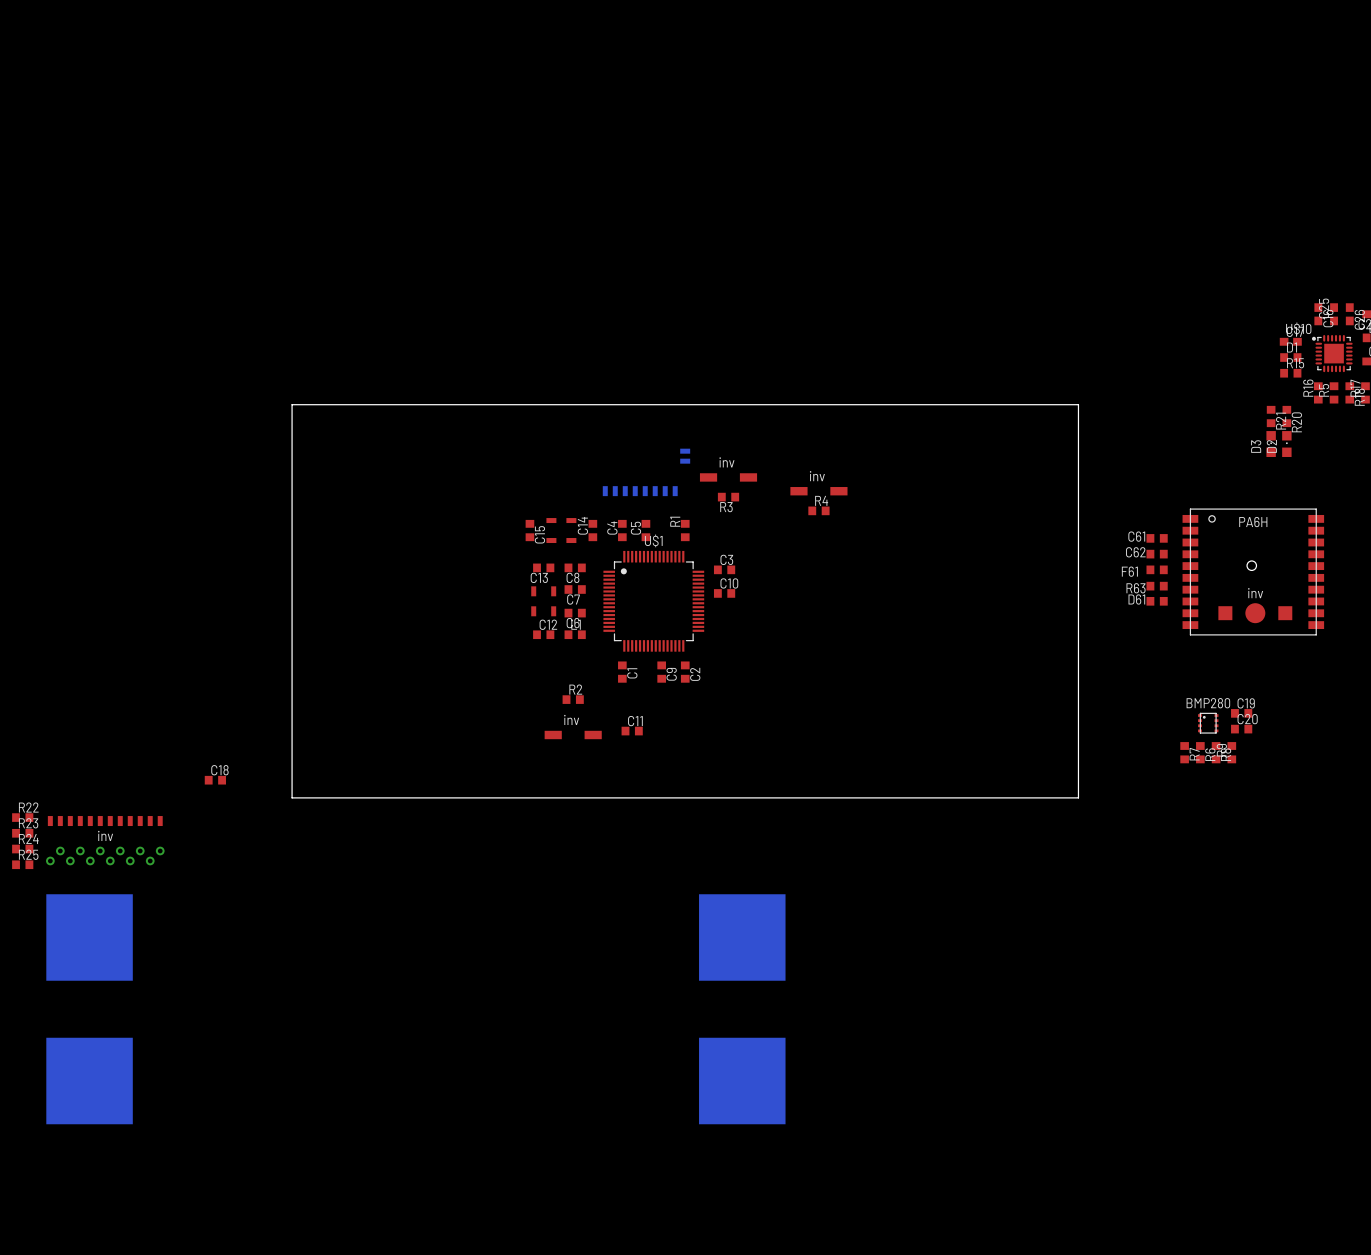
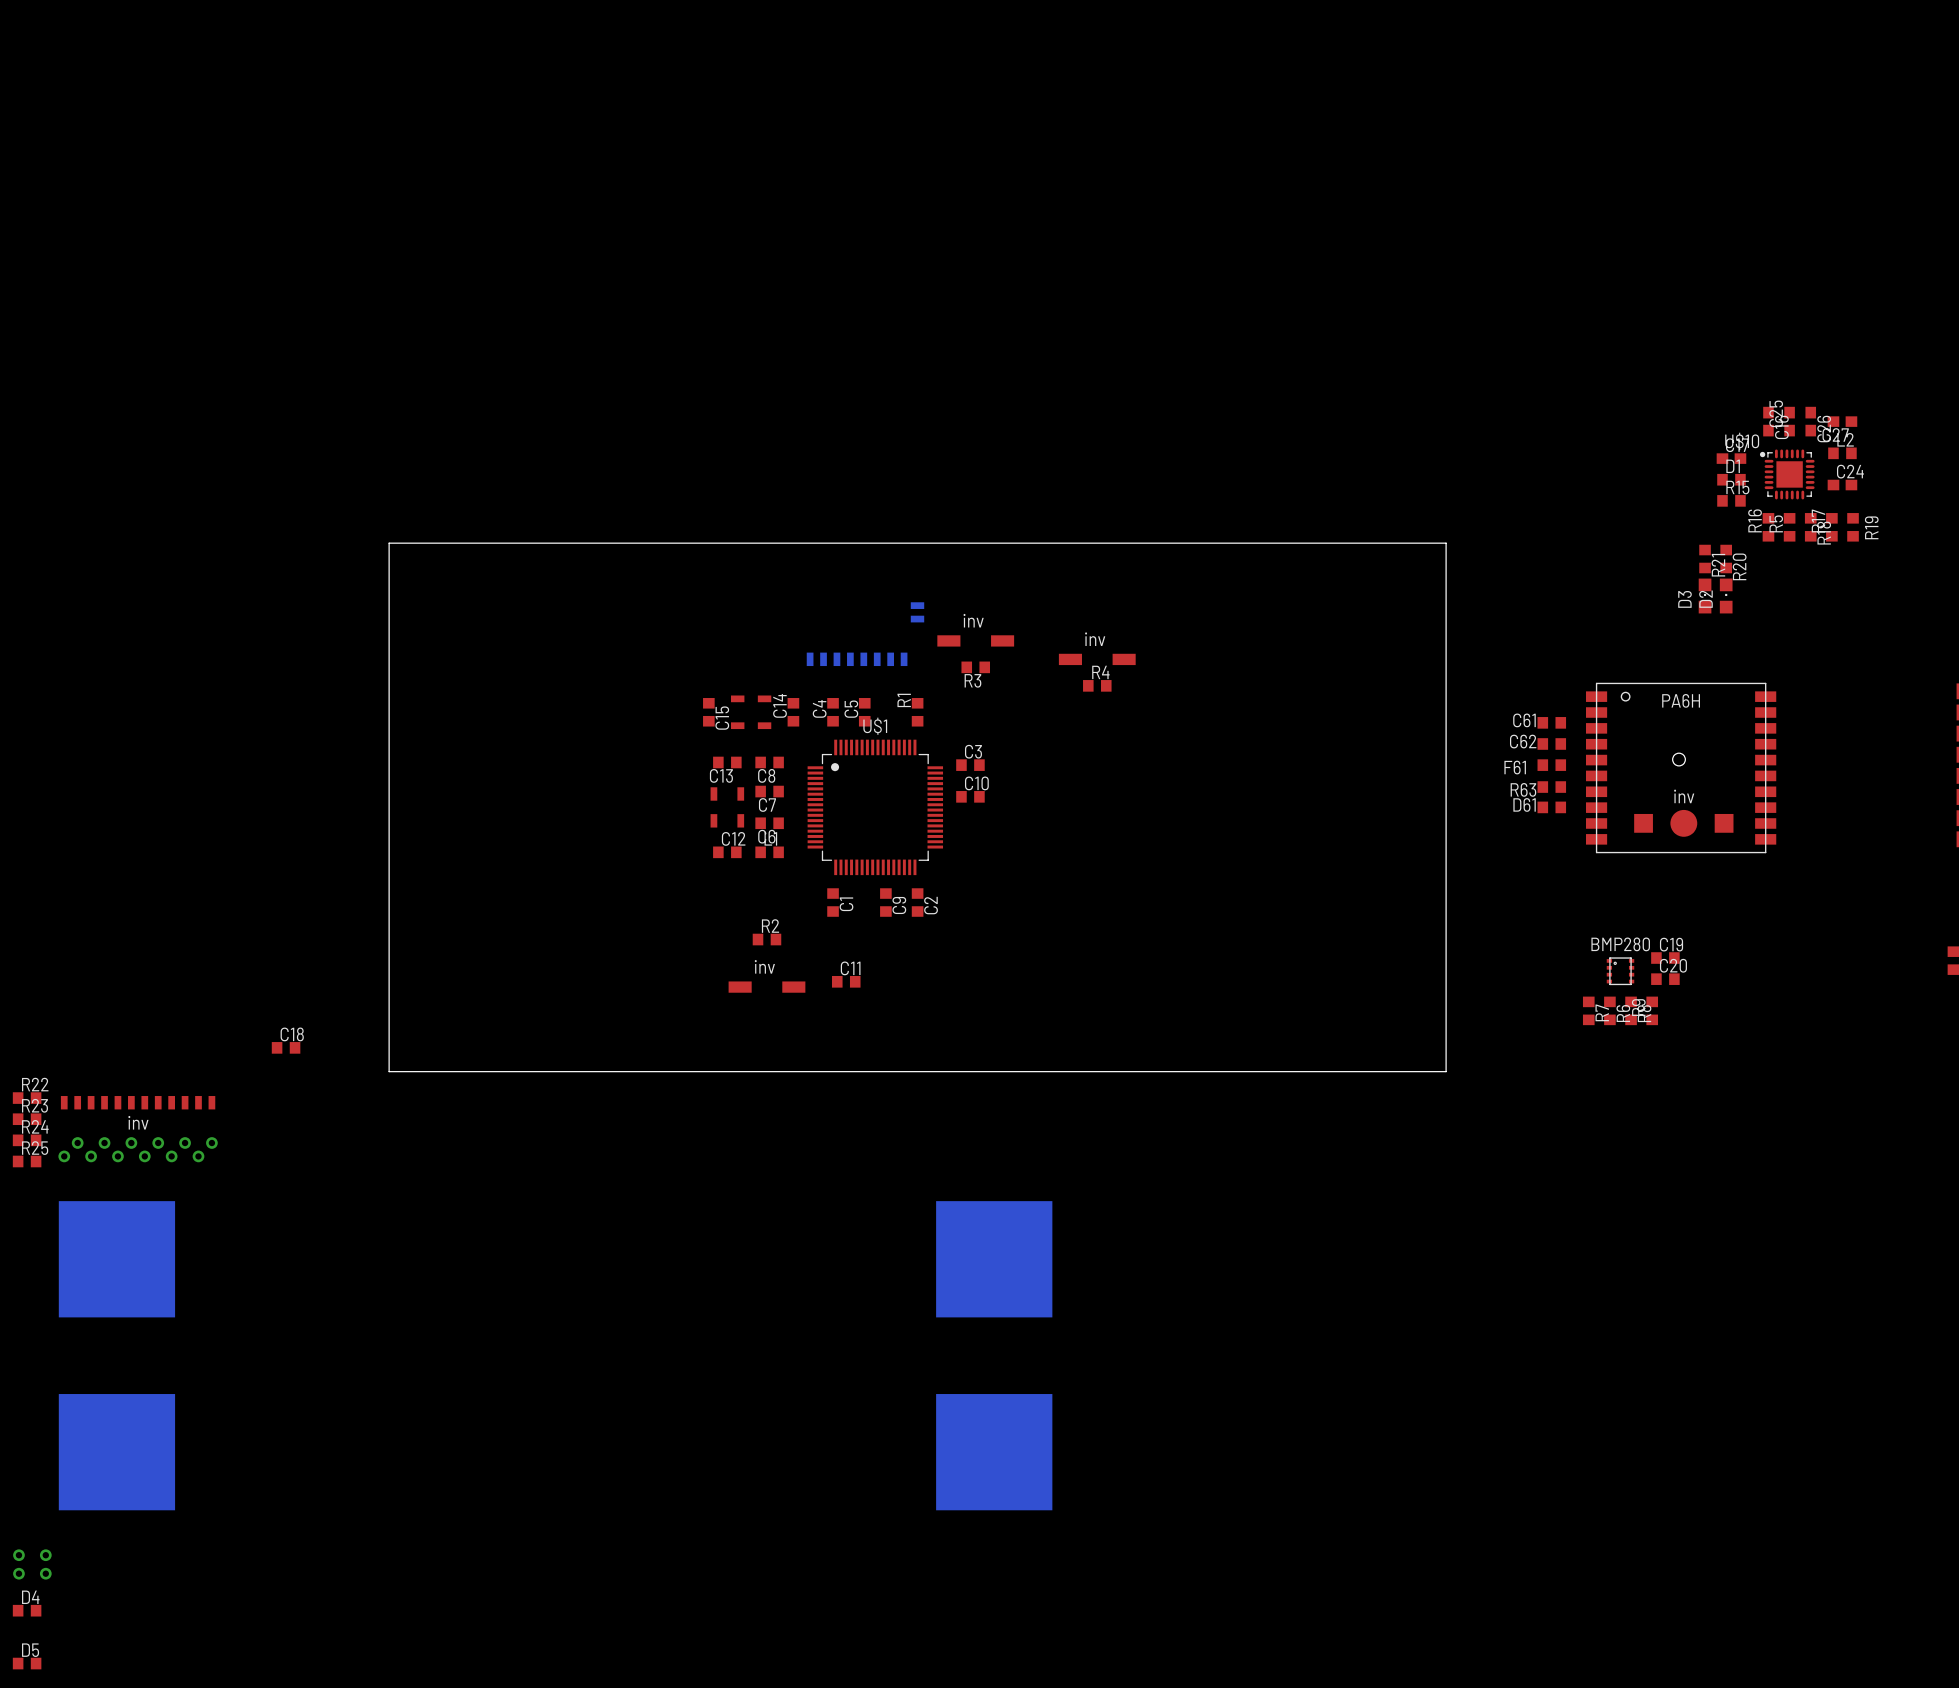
part: none -> (32, 1555)
part: none -> (32, 1573)
D4: none -> (27, 1610)
D5: none -> (27, 1663)

